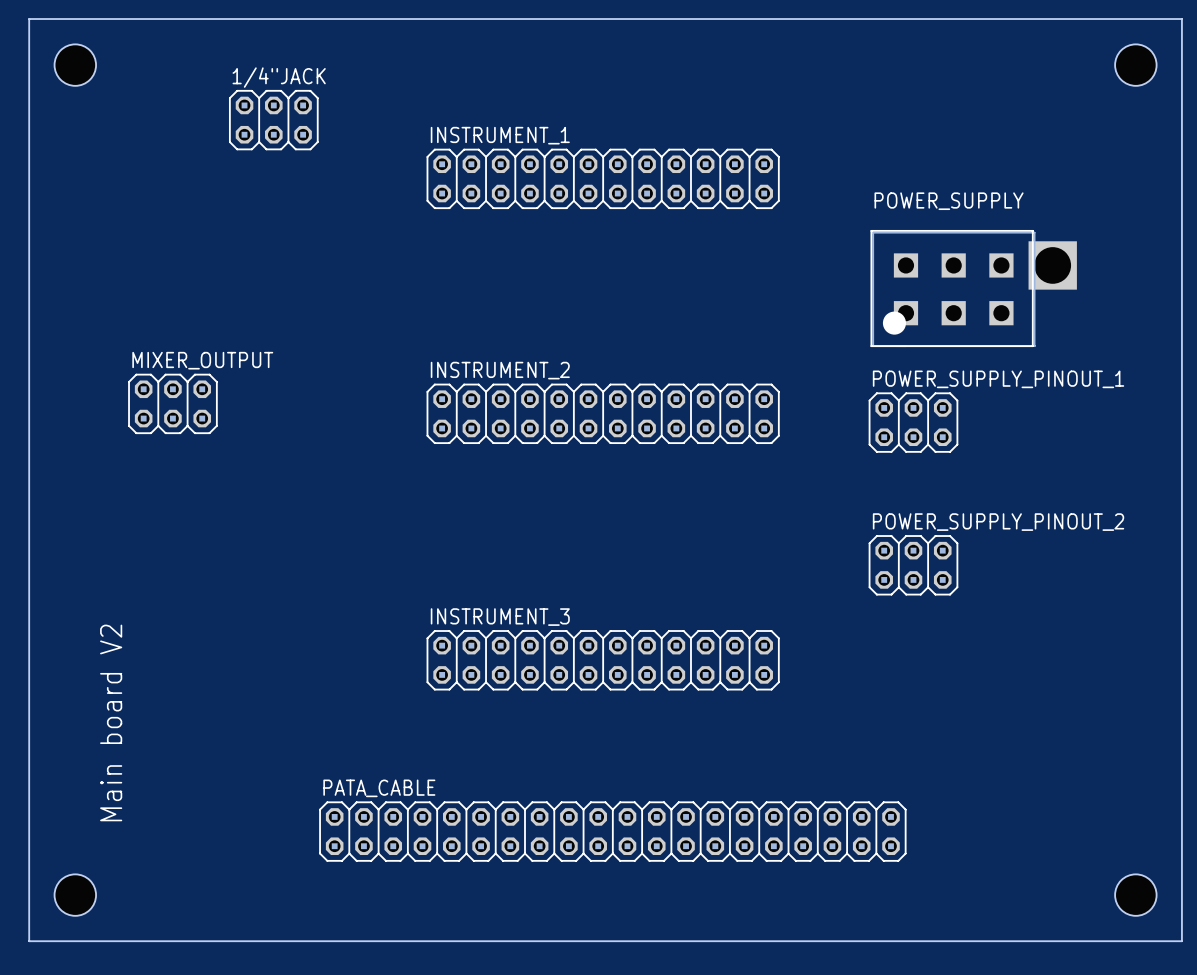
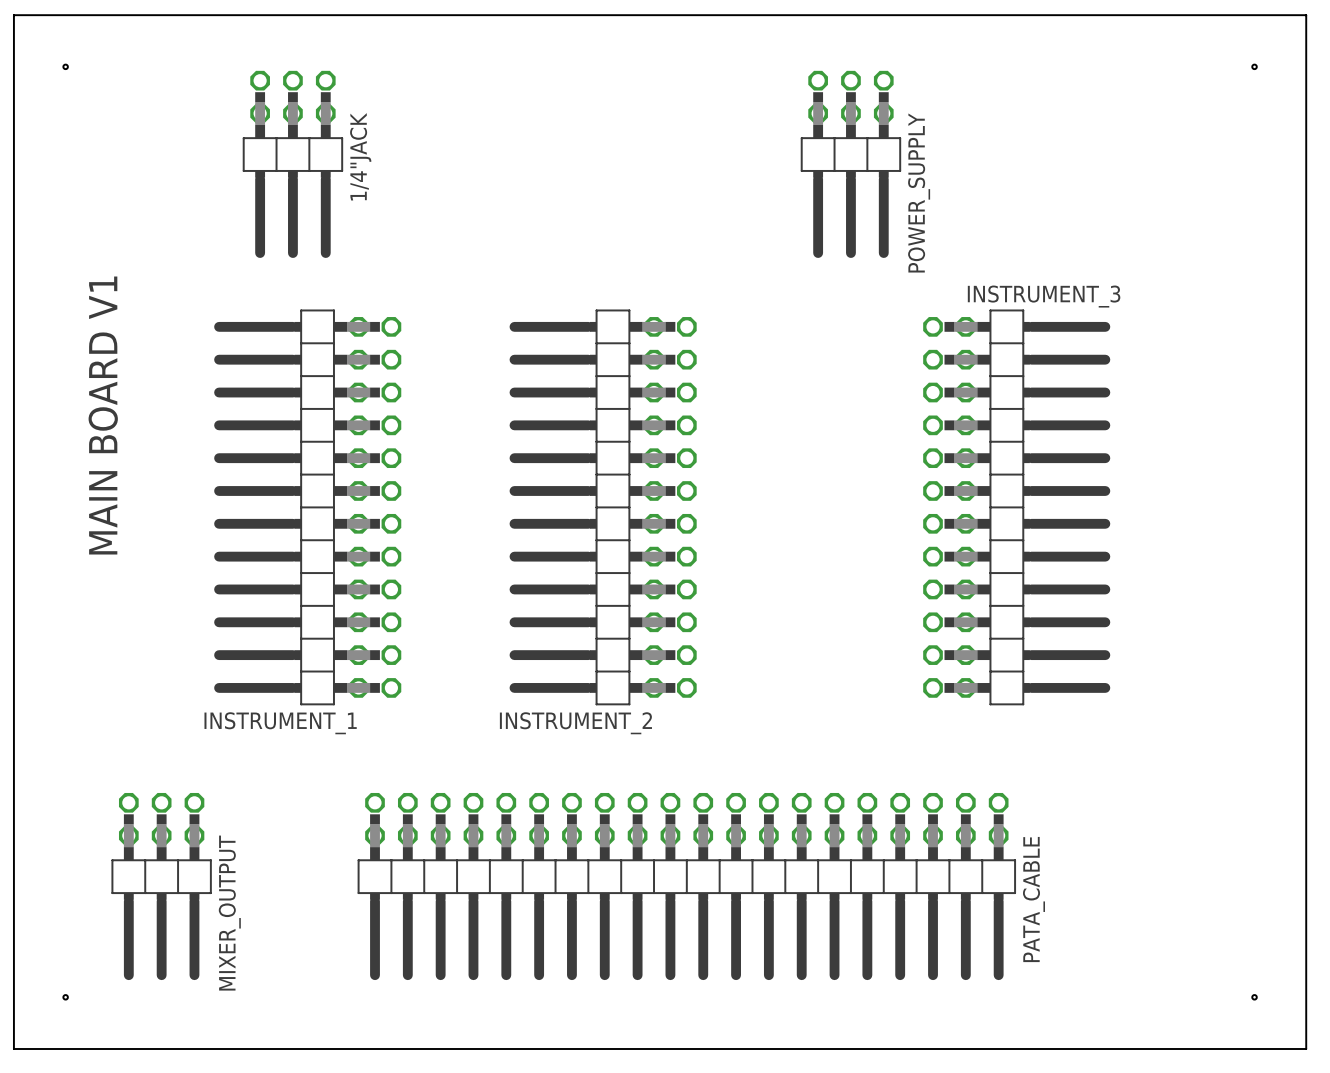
hole size: [54, 44, 97, 86] -> [63, 64, 68, 70]
hole size: [1115, 44, 1157, 86] -> [1252, 64, 1257, 70]
1/4"JACK name position: 1/4"JACK (279, 77) -> 1/4"JACK (360, 156)
1/4"JACK footprint: [229, 89, 319, 151] -> [242, 70, 344, 258]
INSTRUMENT_1 name position: INSTRUMENT_1 (500, 135) -> INSTRUMENT_1 (280, 723)
INSTRUMENT_1 footprint: [426, 148, 780, 210] -> [214, 309, 402, 706]
POWER_SUPPLY: none -> (850, 164)
POWER_SUPPLY: (973, 288) -> none
text: none -> MAIN BOARD V1 (103, 415)
INSTRUMENT_2 name position: INSTRUMENT_2 (500, 370) -> INSTRUMENT_2 (575, 723)
INSTRUMENT_2 footprint: [426, 383, 780, 444] -> [509, 309, 697, 706]
MIXER_OUTPUT: (172, 403) -> none
POWER_SUPPLY_PINOUT_1: (913, 422) -> none
POWER_SUPPLY_PINOUT_2: (913, 565) -> none
INSTRUMENT_3 name position: INSTRUMENT_3 (500, 617) -> INSTRUMENT_3 (1044, 296)
INSTRUMENT_3 footprint: [426, 630, 780, 691] -> [923, 309, 1111, 706]
text: Main board V2 (111, 722) -> none
MIXER_OUTPUT: none -> (161, 886)
PATA_CABLE: none -> (686, 886)
PATA_CABLE: (612, 831) -> none
hole size: [54, 874, 97, 916] -> [63, 995, 68, 1000]
hole size: [1115, 874, 1157, 916] -> [1252, 995, 1257, 1000]

